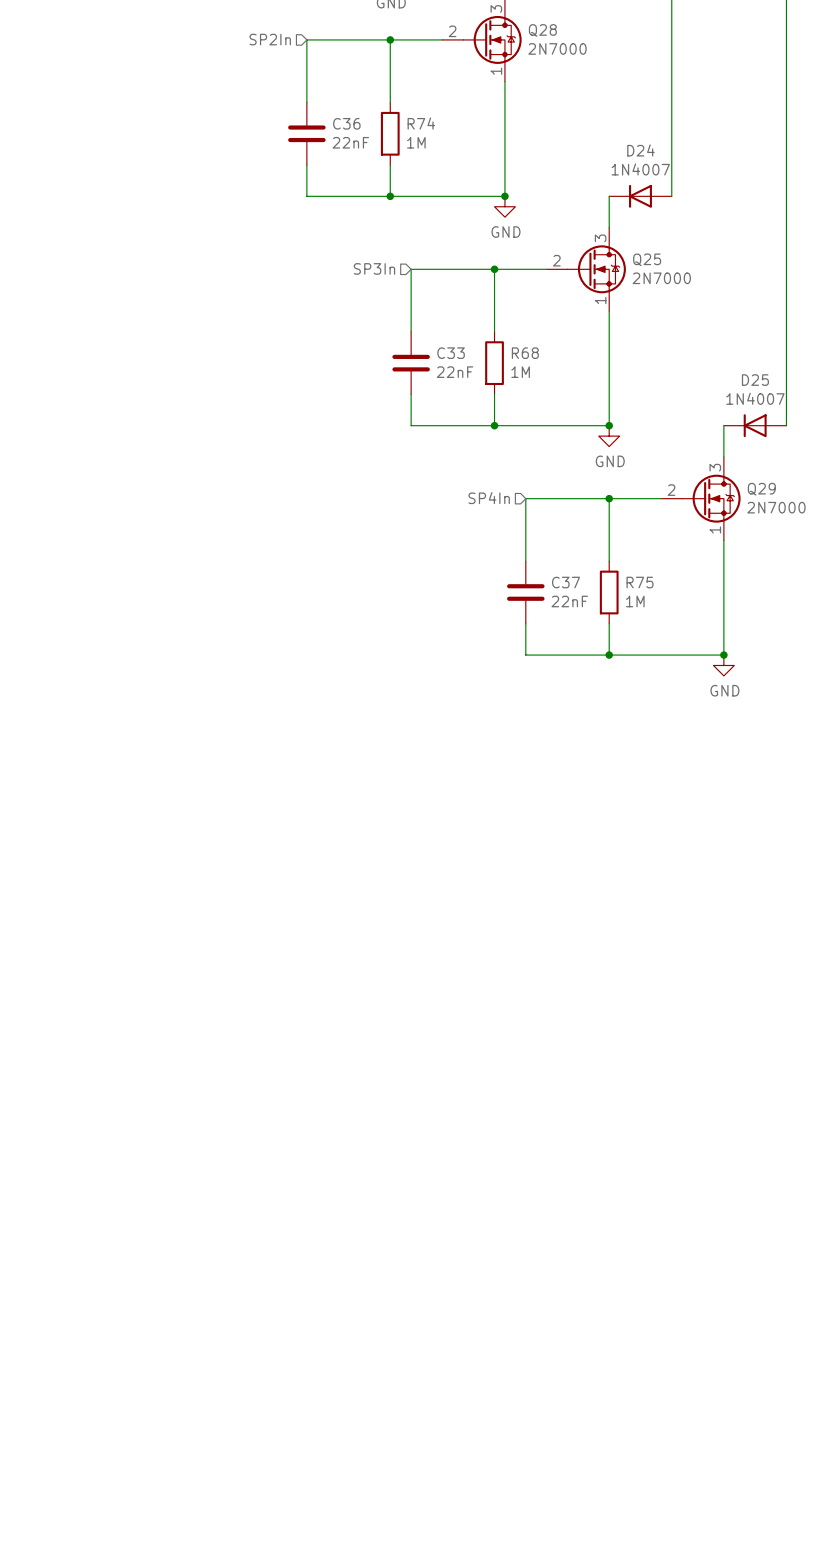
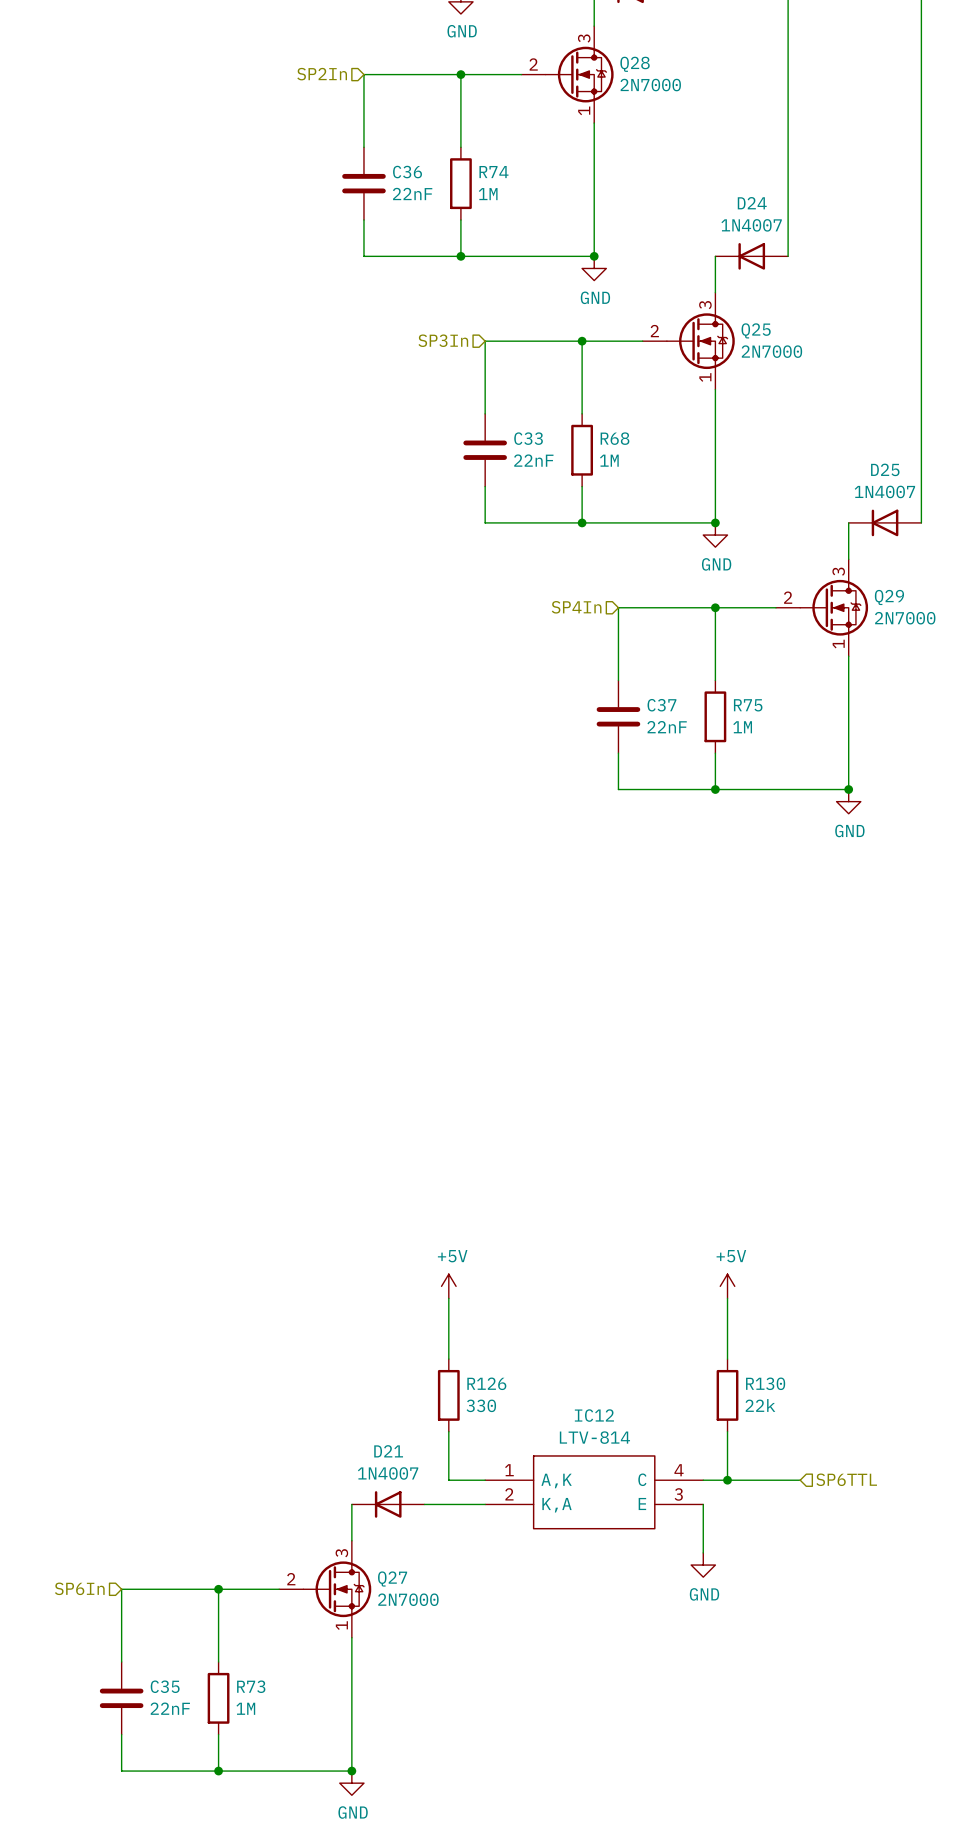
power symbol: none -> +5V (448, 1286)
power symbol: none -> +5V (727, 1286)
wire: none -> (448, 1298) (448, 1359)
wire: none -> (727, 1298) (727, 1359)
R126: none -> 330 (448, 1395)
R130: none -> 22k (727, 1395)
wire: none -> (448, 1431) (448, 1480) (485, 1480)
wire: none -> (727, 1431) (727, 1480)
hierarchical label: none -> SP6TTL (846, 1479)
wire: none -> (703, 1480) (800, 1480)
junction: none -> (727, 1480)
IC12: none -> LTV-814 (594, 1492)
wire: none -> (351, 1504) (351, 1540)
D21: none -> 1N4007 (388, 1504)
wire: none -> (424, 1504) (485, 1504)
wire: none -> (703, 1504) (703, 1552)
power symbol: none -> GND (703, 1565)
hierarchical label: none -> SP6In (79, 1588)
wire: none -> (218, 1589) (218, 1661)
junction: none -> (218, 1589)
wire: none -> (279, 1589) (121, 1589) (121, 1661)
Q27: none -> 2N7000 (325, 1589)
wire: none -> (351, 1637) (351, 1771) (121, 1771) (121, 1734)
C35: none -> 22nF (121, 1698)
R73: none -> 1M (218, 1698)
wire: none -> (218, 1734) (218, 1771)
junction: none -> (218, 1771)
junction: none -> (351, 1771)
power symbol: none -> GND (351, 1783)

